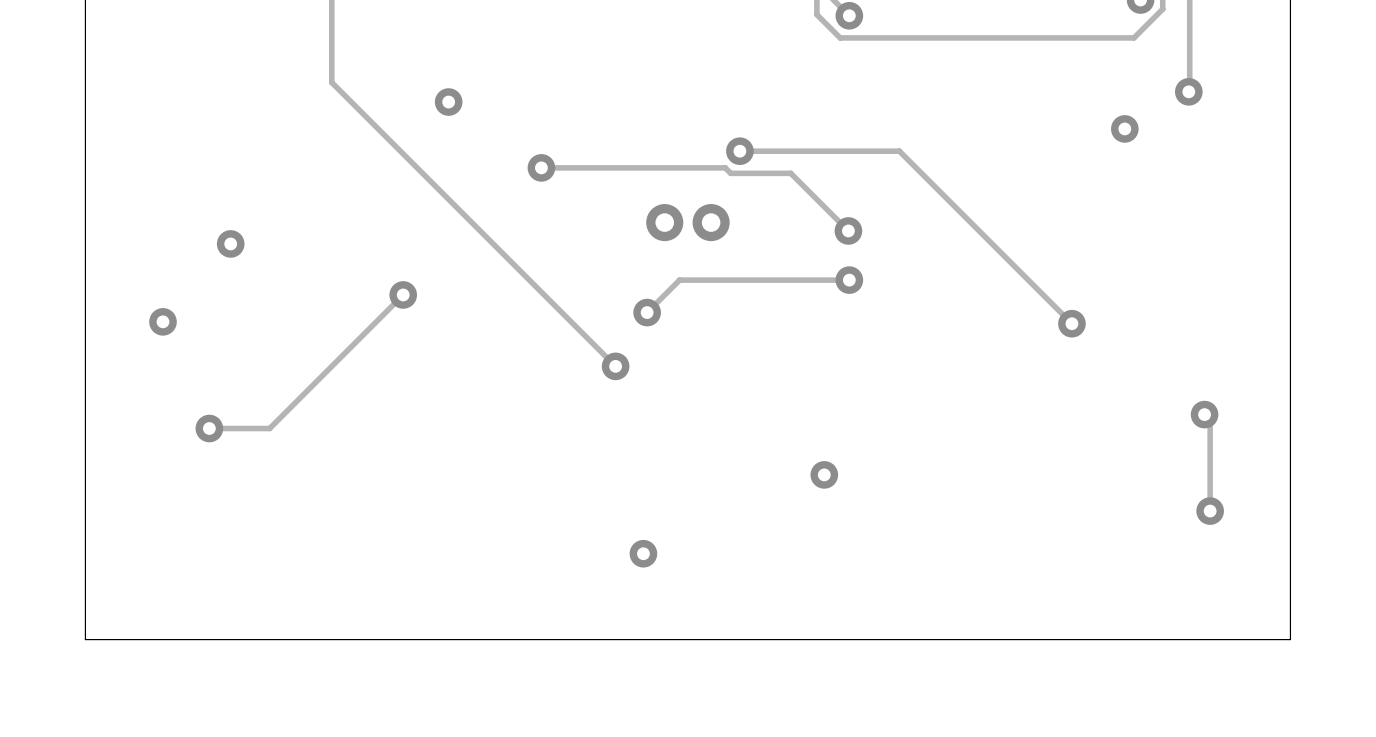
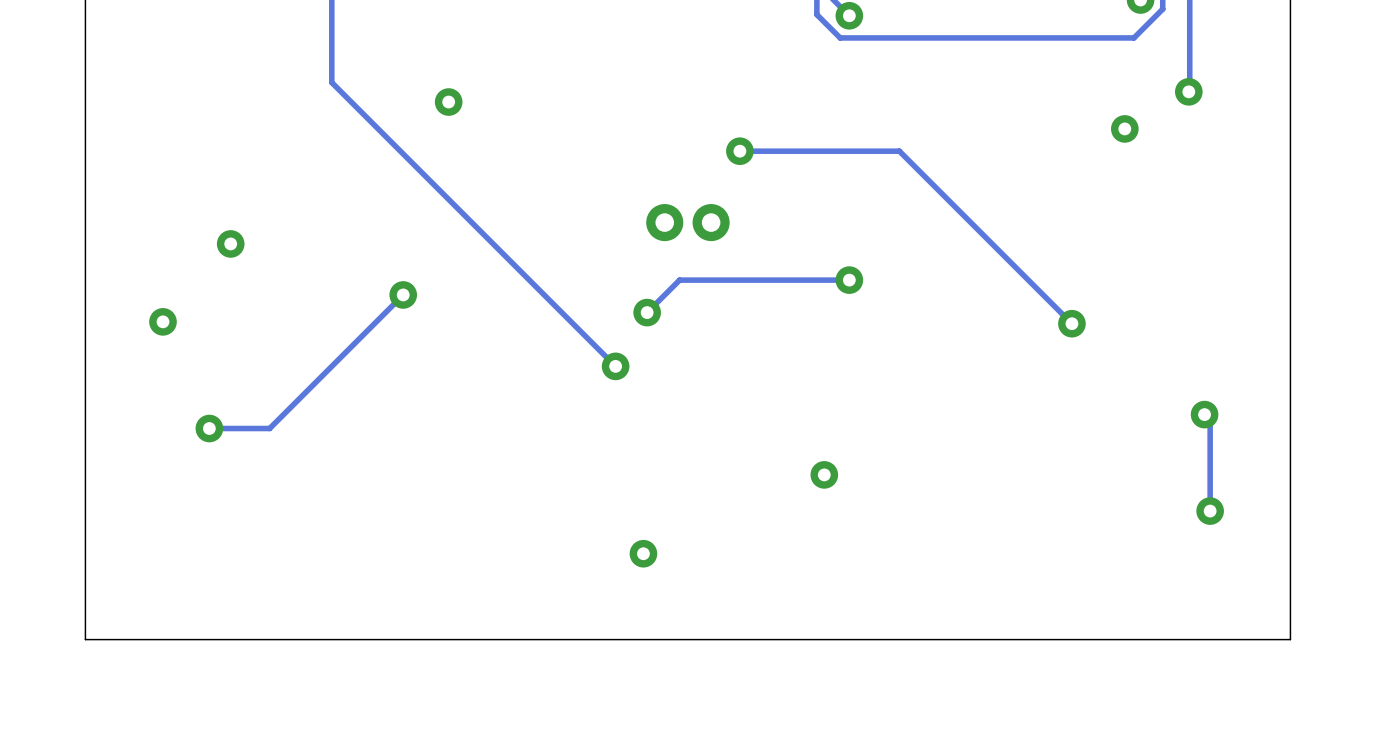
track: (541, 167) (725, 167) (730, 173) (790, 173) (848, 230) -> none
via: (541, 167) -> none
via: (848, 230) -> none

